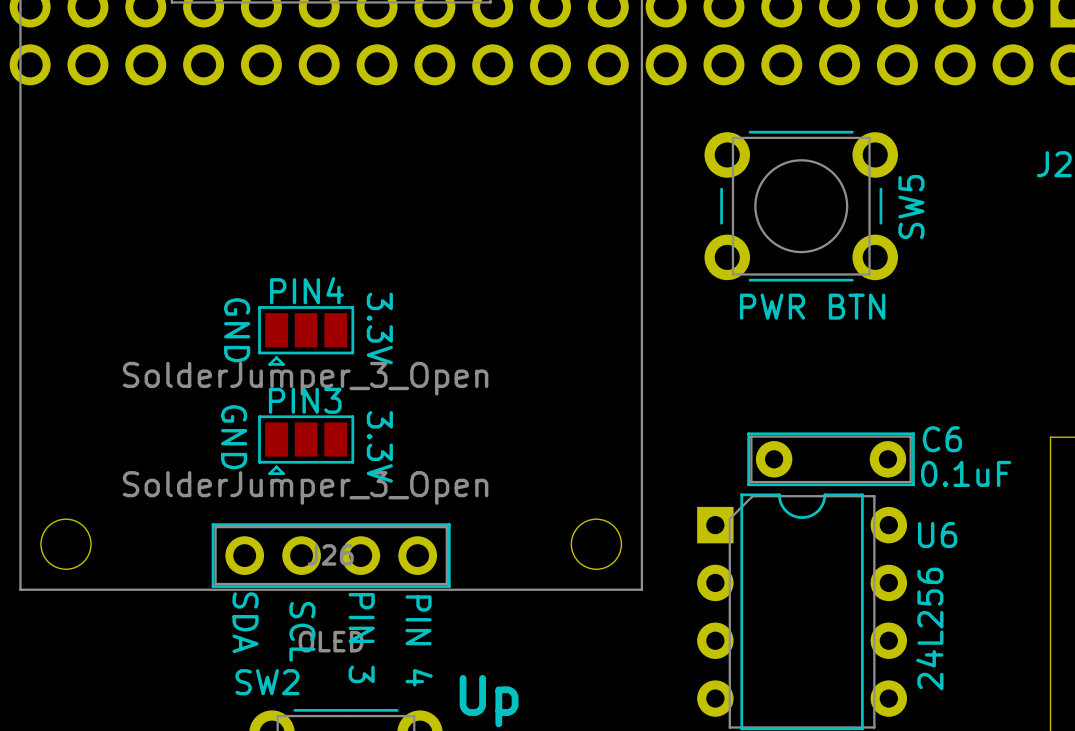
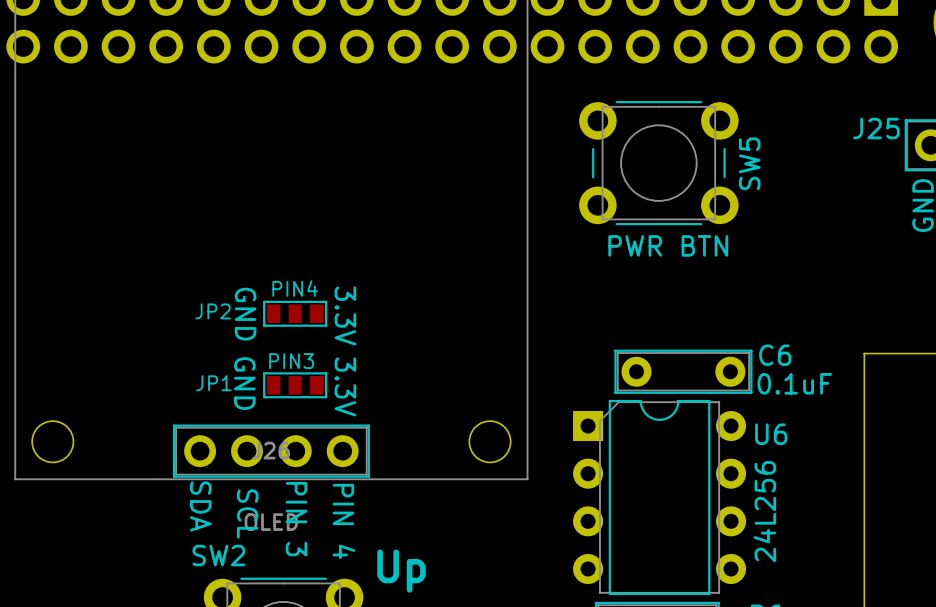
text: 3.3V (379, 328) -> none
text: GND (237, 330) -> none
PIN4: SolderJumper_3_Open (306, 335) -> none
JP2: none -> PIN4 (295, 313)
text: none -> GND (245, 314)
text: none -> 3.3V (345, 315)
text: GND (234, 437) -> none
PIN3: SolderJumper_3_Open (306, 445) -> none
text: 3.3V (379, 446) -> none
text: none -> GND (244, 383)
JP1: none -> PIN3 (295, 385)
text: none -> 3.3V (345, 386)

